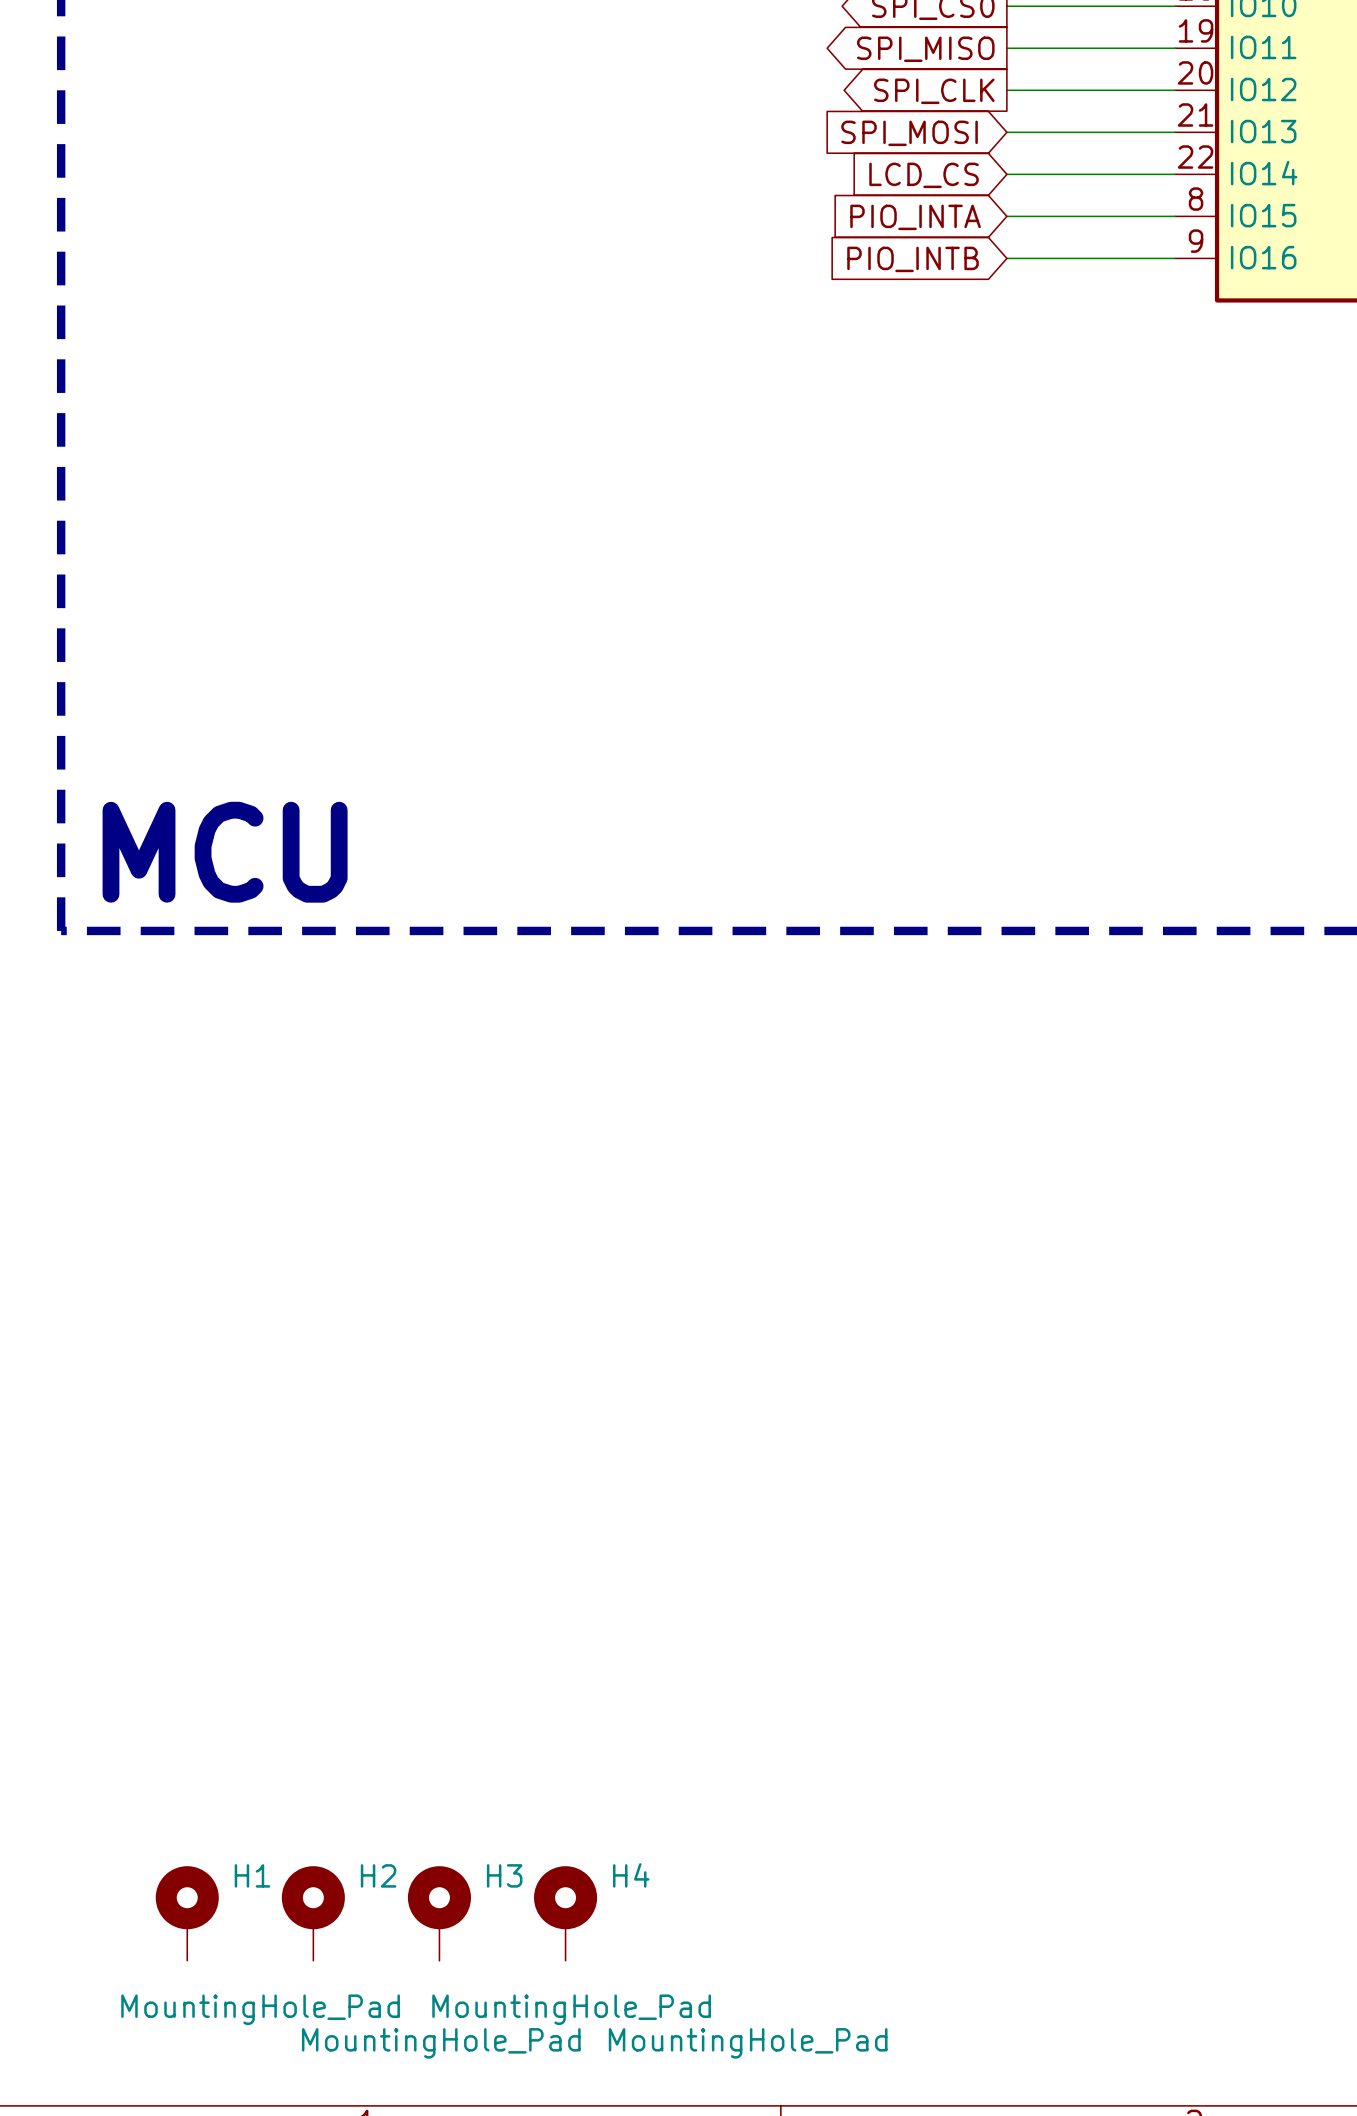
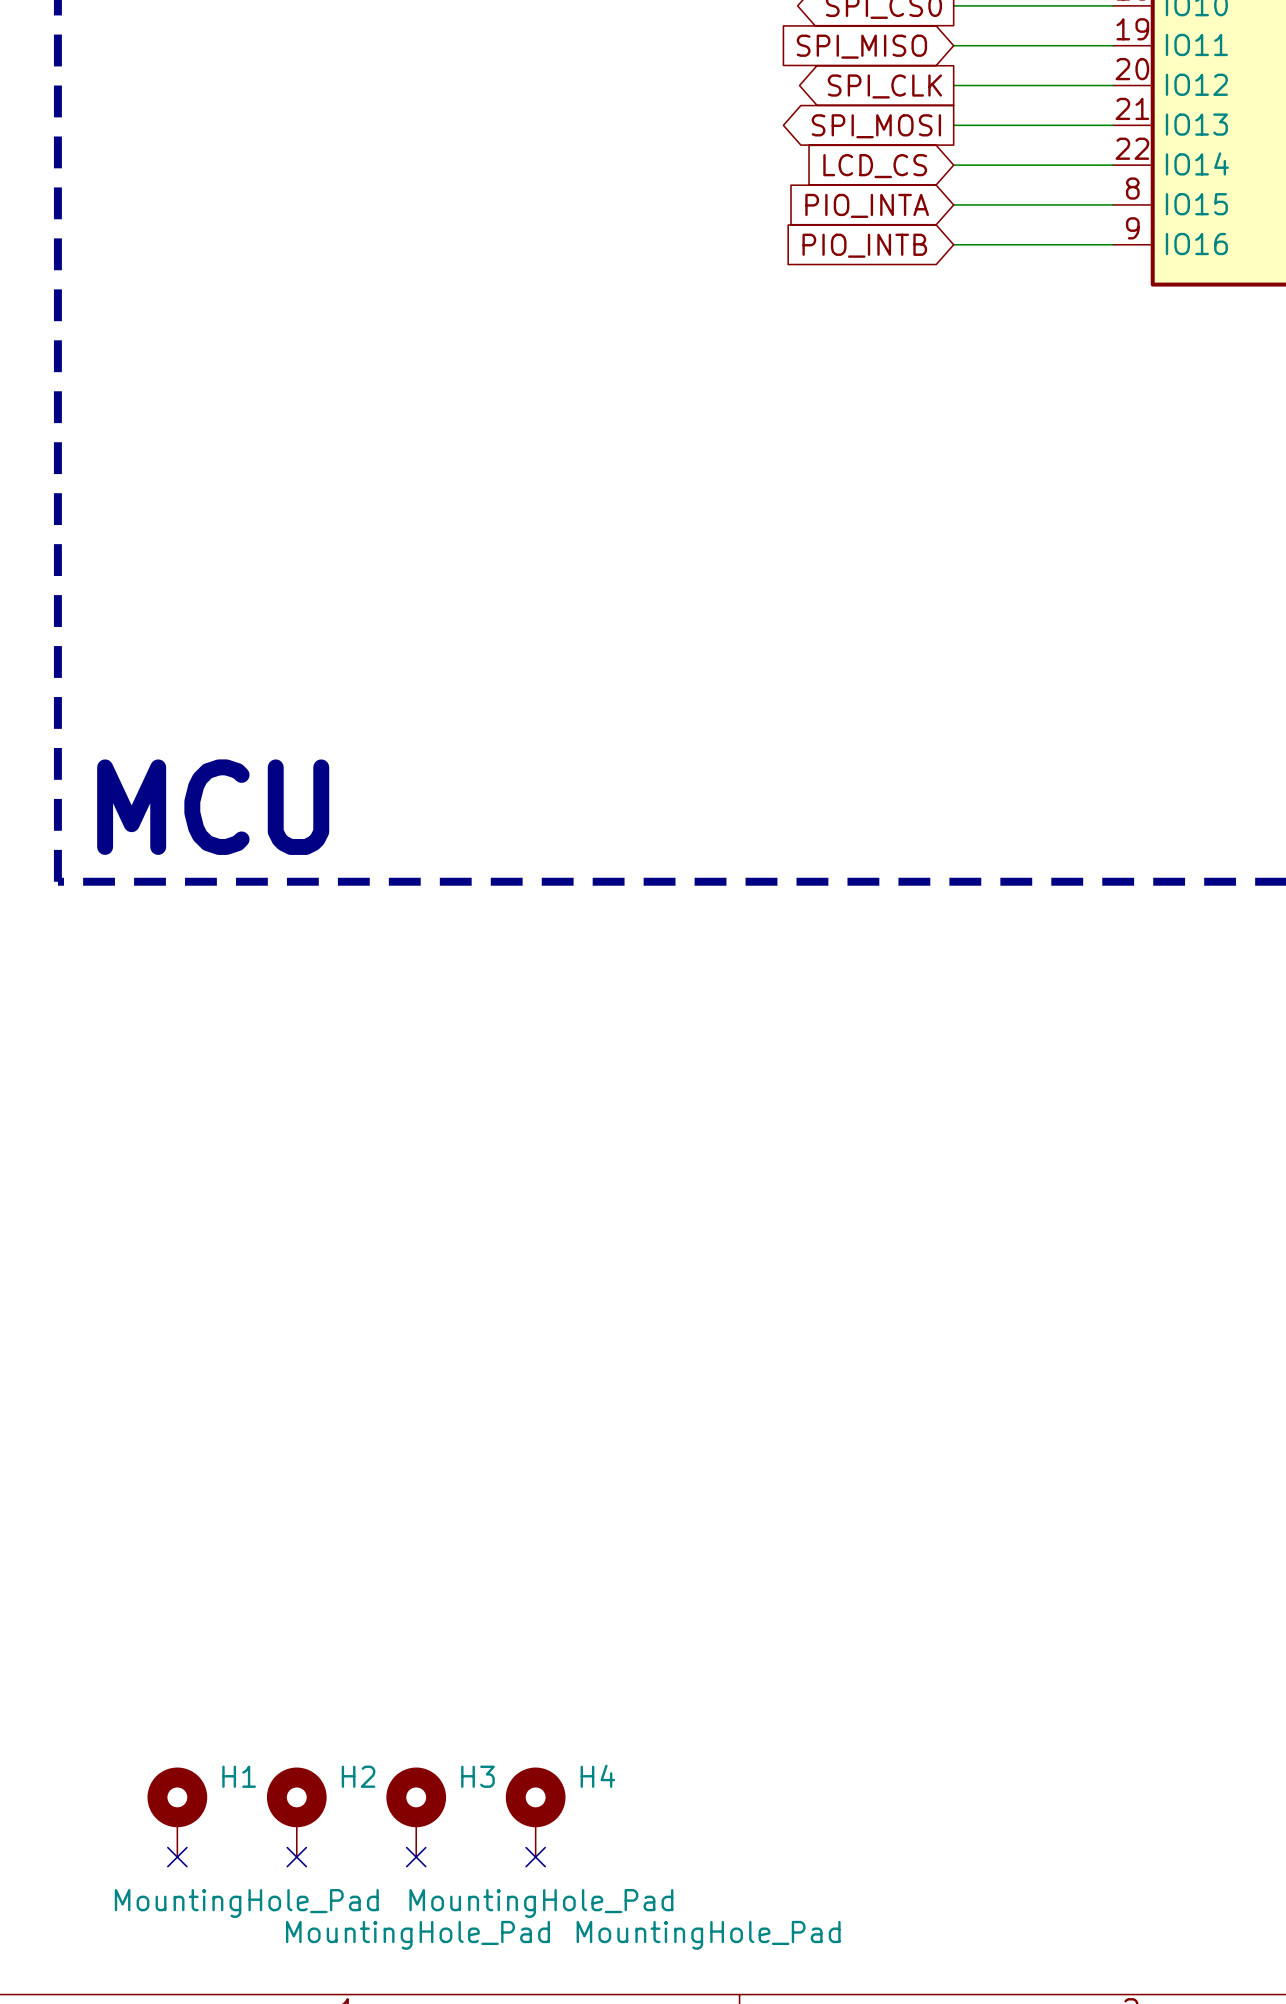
global label shape: output (925, 49) -> input (861, 46)
global label shape: input (909, 133) -> output (876, 126)
no-connect mark: none -> (177, 1857)
no-connect mark: none -> (296, 1857)
no-connect mark: none -> (416, 1857)
no-connect mark: none -> (535, 1857)

